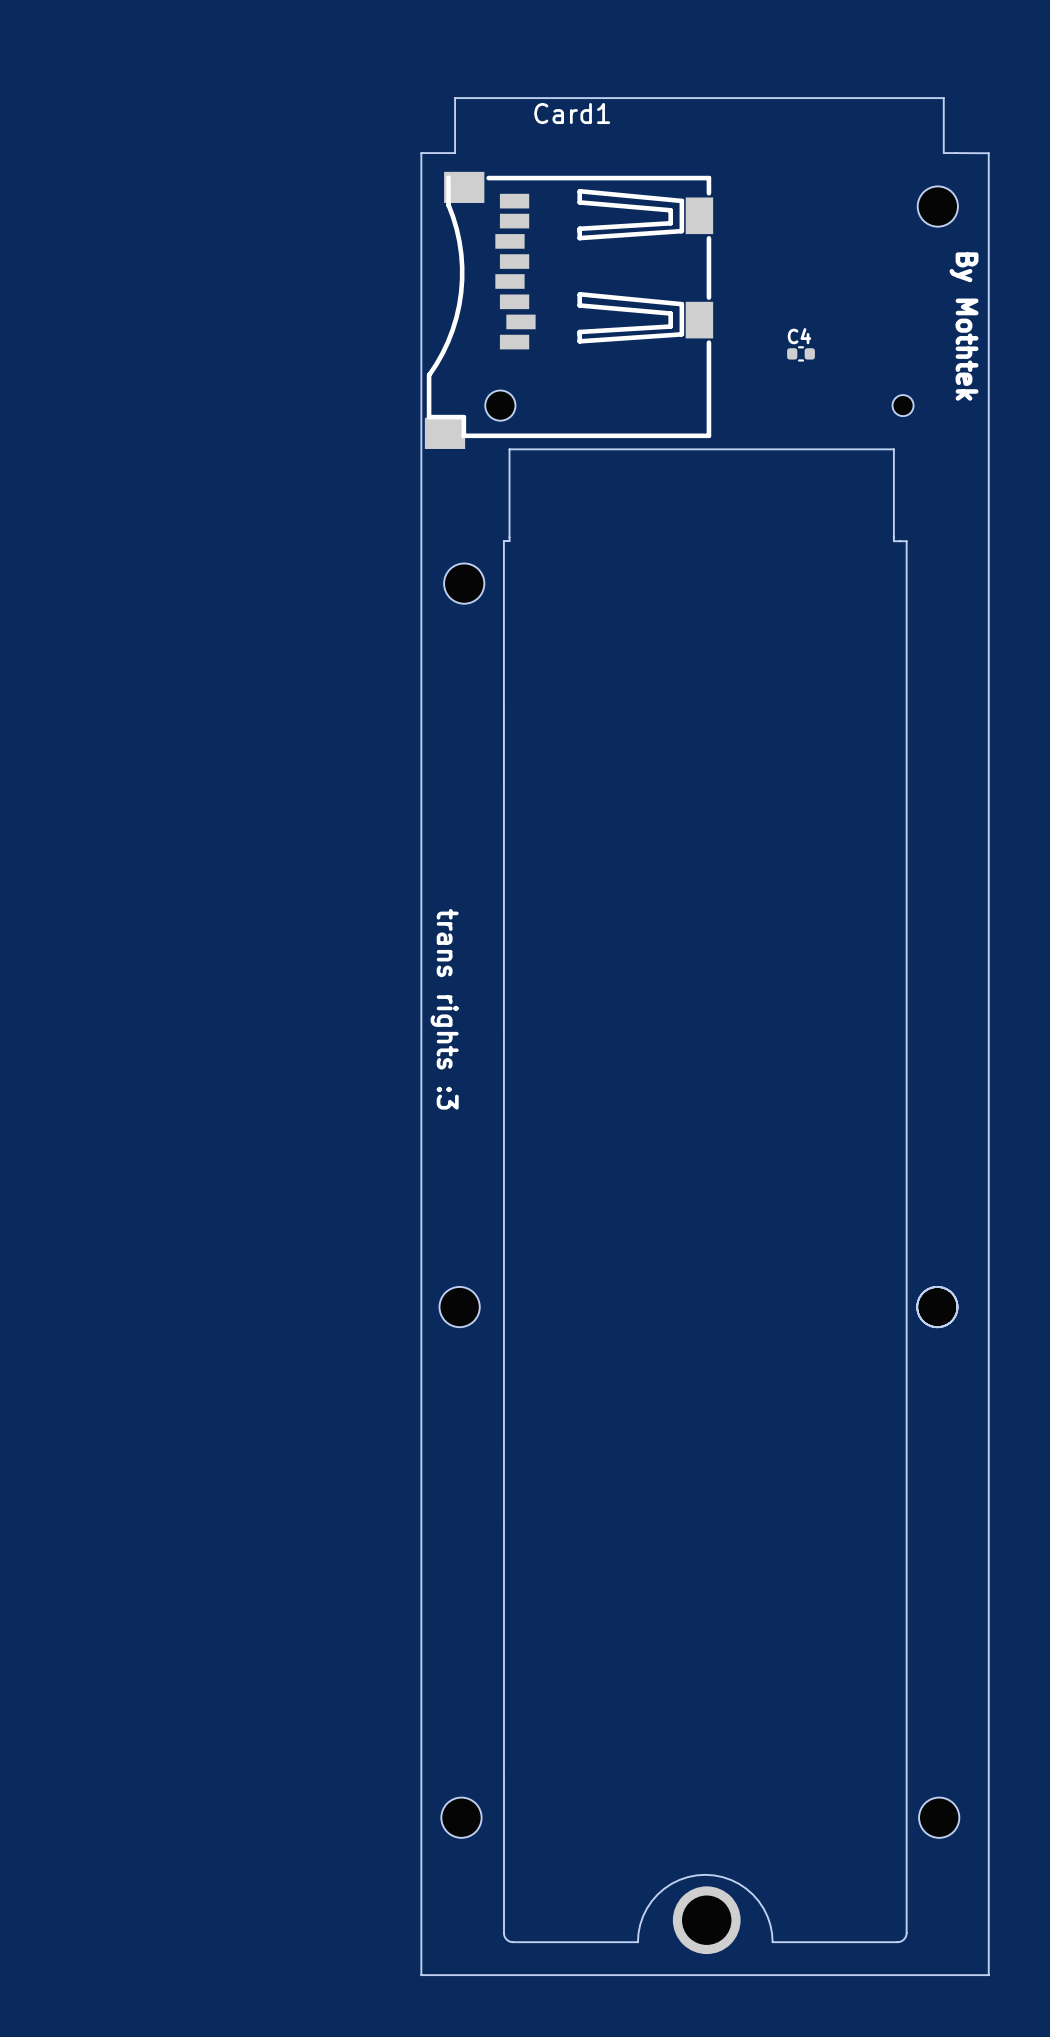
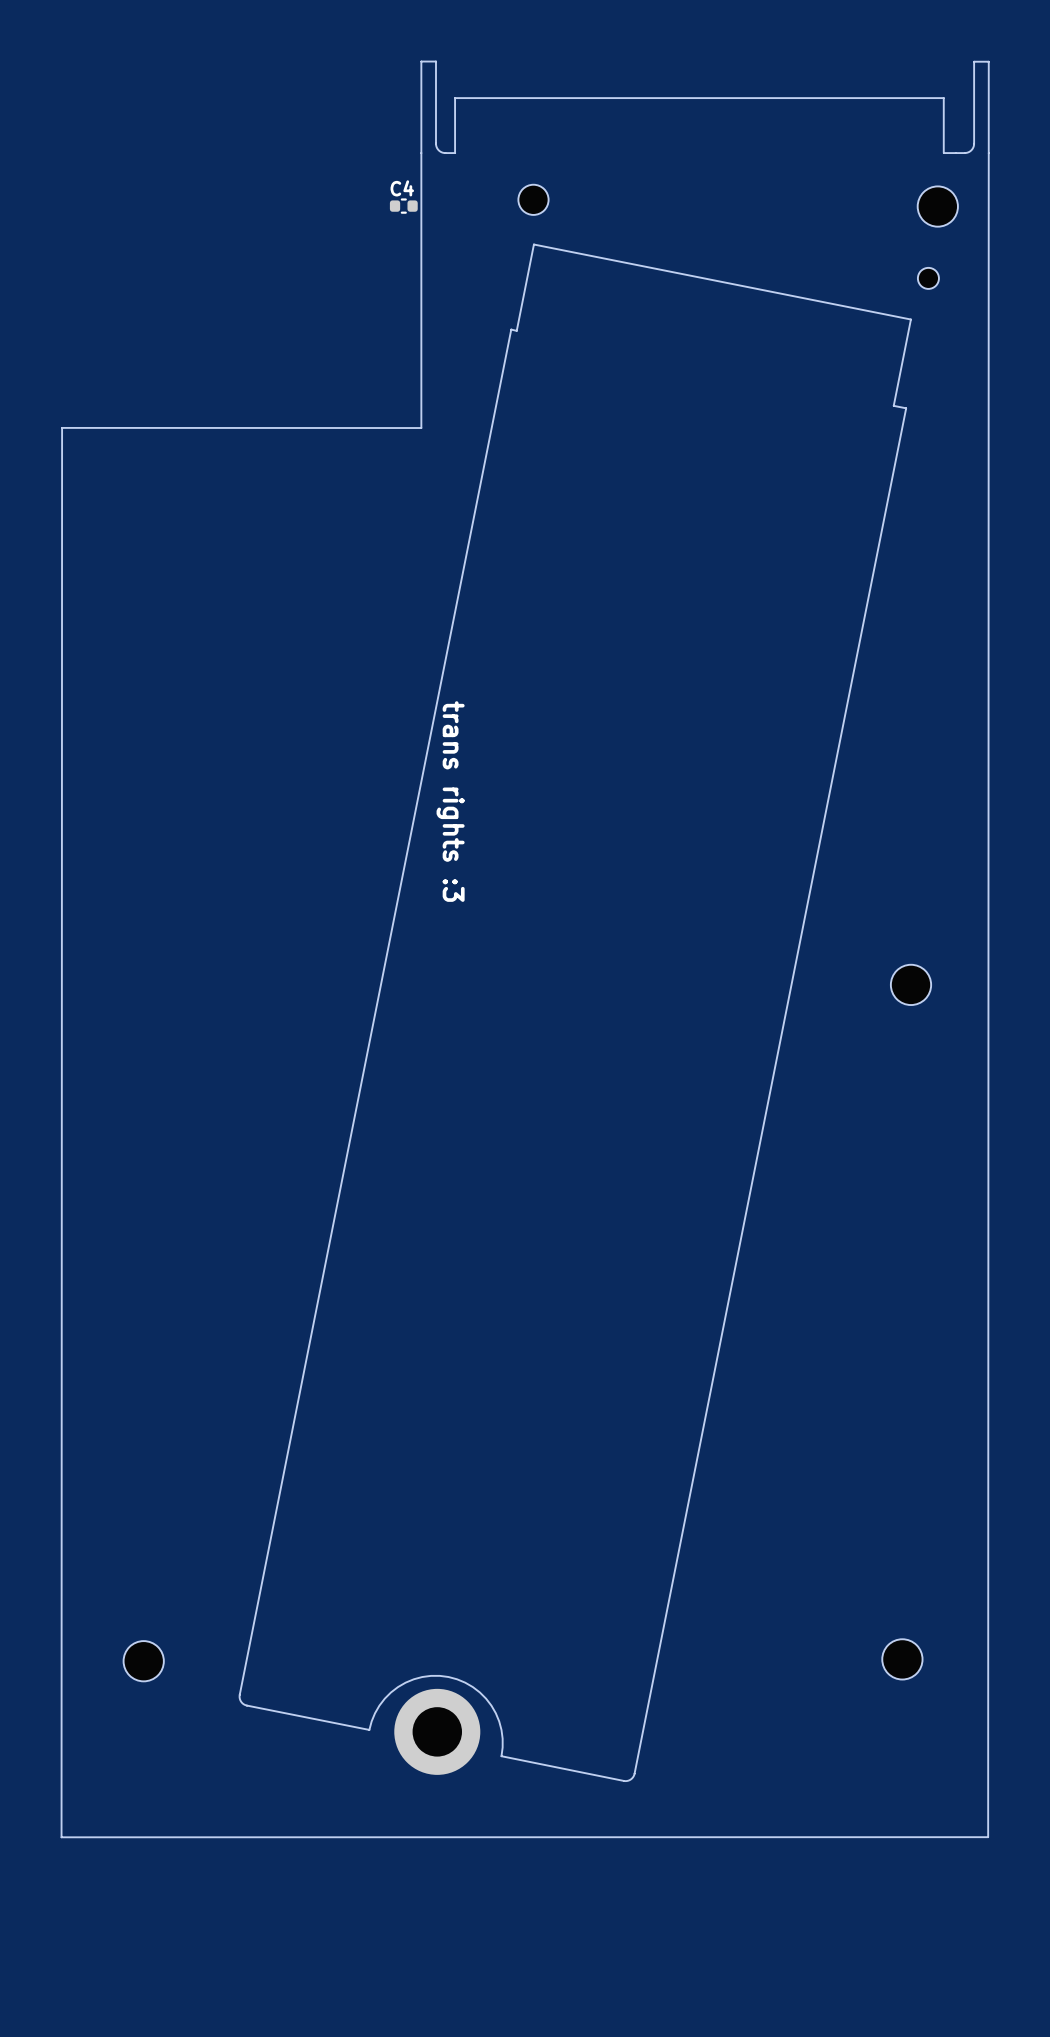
board edge: none -> (974, 143) (972, 149) (968, 152) (955, 153)
board edge: (445, 153) (421, 153) -> (445, 153) (438, 150) (436, 144) (435, 61) (421, 61) (421, 153)
board edge: (955, 153) (988, 153) (988, 1975) (421, 1975) (421, 428) -> (974, 143) (974, 61) (988, 61) (988, 1837) (61, 1837) (62, 427) (421, 428)
part: none -> (727, 295)
Card1: (569, 310) -> none
text: By Mothtek (964, 326) -> none
board edge: none -> (516, 330) (511, 329) (239, 1696) (241, 1702) (246, 1705) (369, 1729) (379, 1705) (398, 1687) (422, 1677) (448, 1677) (472, 1687) (491, 1705) (501, 1729) (501, 1756) (623, 1780) (630, 1779) (634, 1773) (906, 408) (893, 405)
C4 position: (801, 353) -> (403, 206)
part: (699, 463) -> none
board edge: (509, 537) (509, 541) (503, 541) (504, 1935) (507, 1940) (513, 1942) (637, 1942) (643, 1916) (657, 1894) (679, 1879) (705, 1874) (731, 1879) (752, 1894) (767, 1916) (772, 1942) (898, 1942) (904, 1938) (906, 1933) -> none
board edge: (893, 537) (893, 541) (906, 541) (906, 1932) -> none
part: (464, 583) -> none
part: none -> (911, 984)
text position: trans rights :3 (444, 1009) -> trans rights :3 (450, 801)
part: (459, 1307) -> none
part: (937, 1307) -> none
part: none -> (143, 1661)
part: none -> (437, 1731)
part: (461, 1817) -> none
part position: (939, 1817) -> (902, 1659)
part: (706, 1920) -> none

